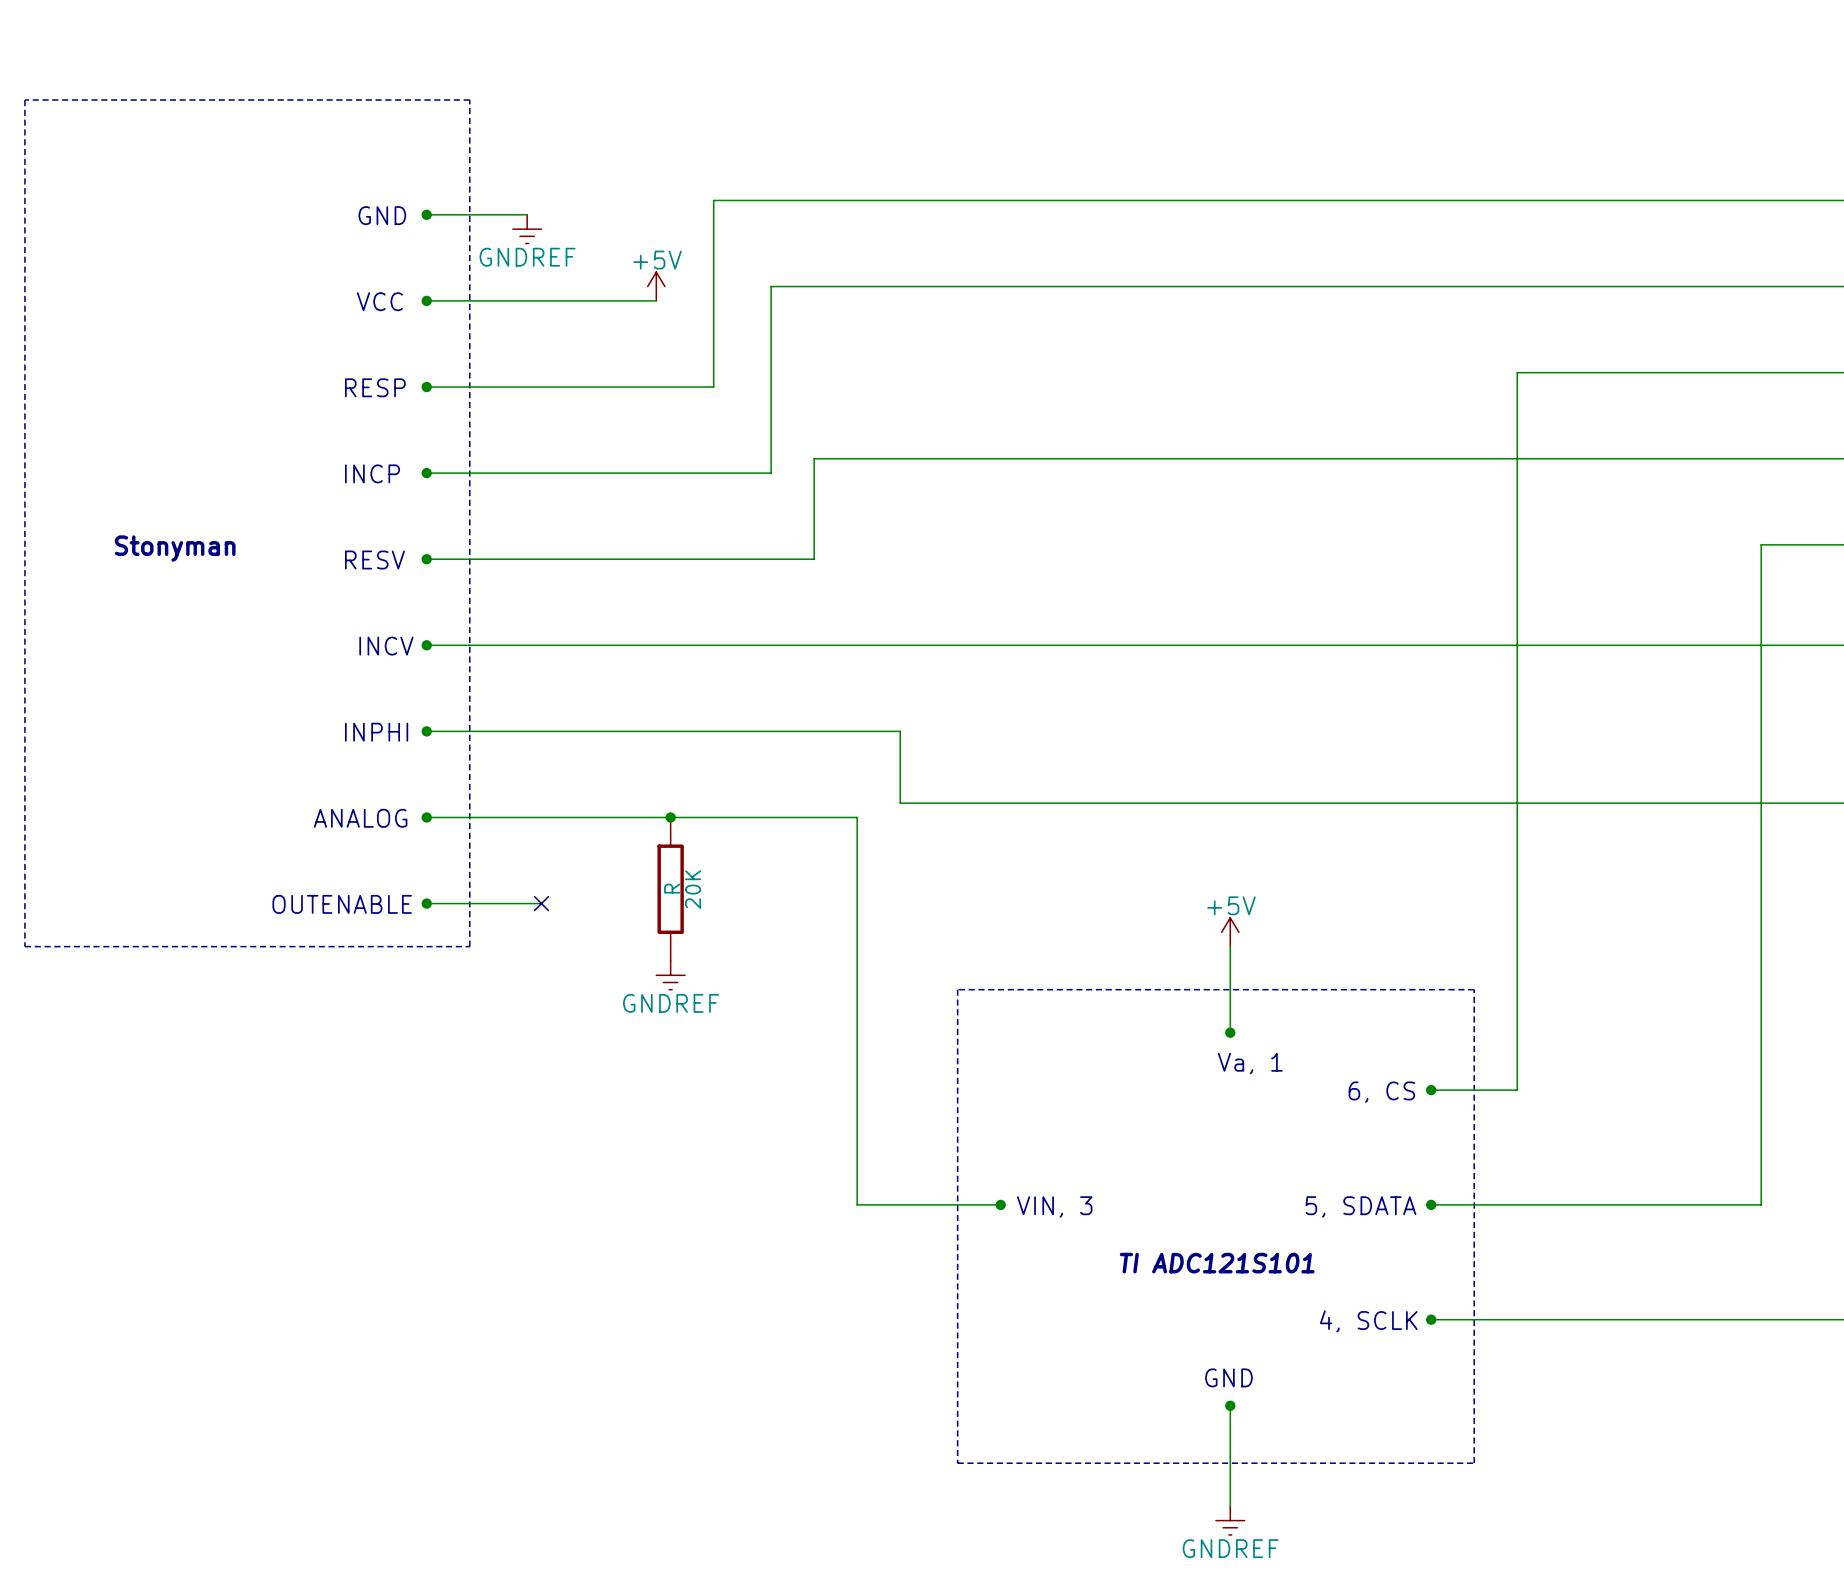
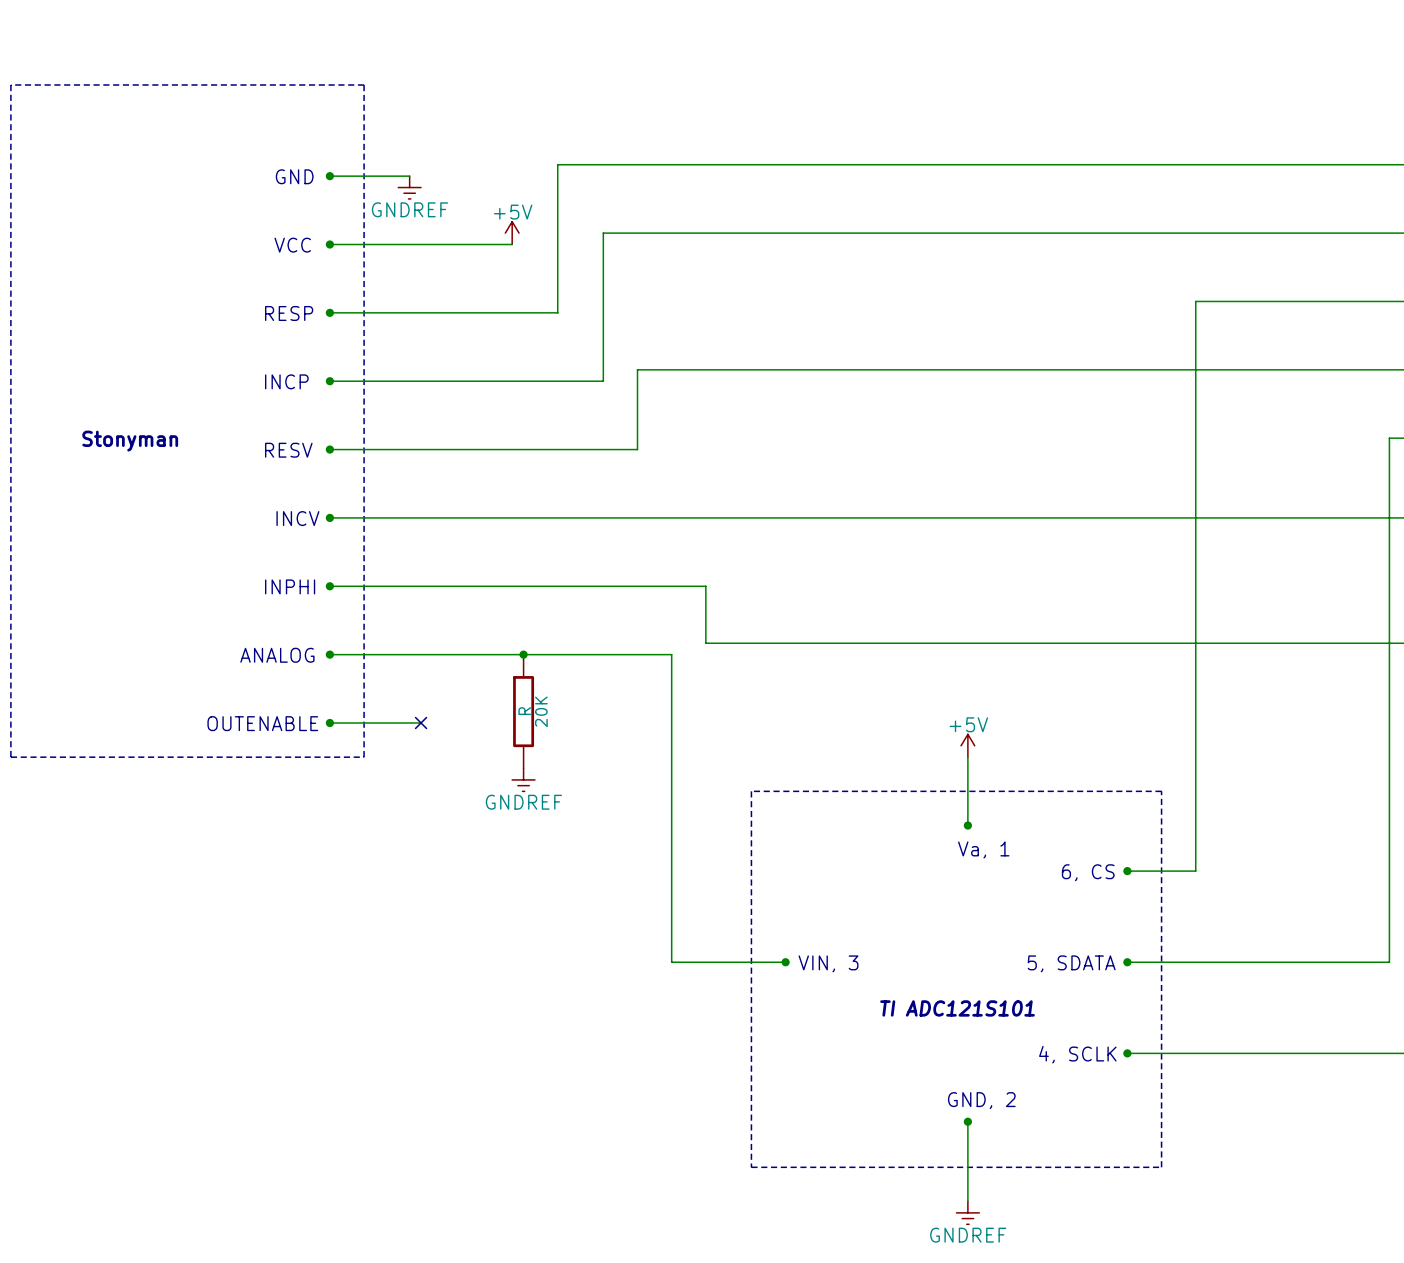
text: GND (1228, 1377) -> GND, 2 (981, 1100)

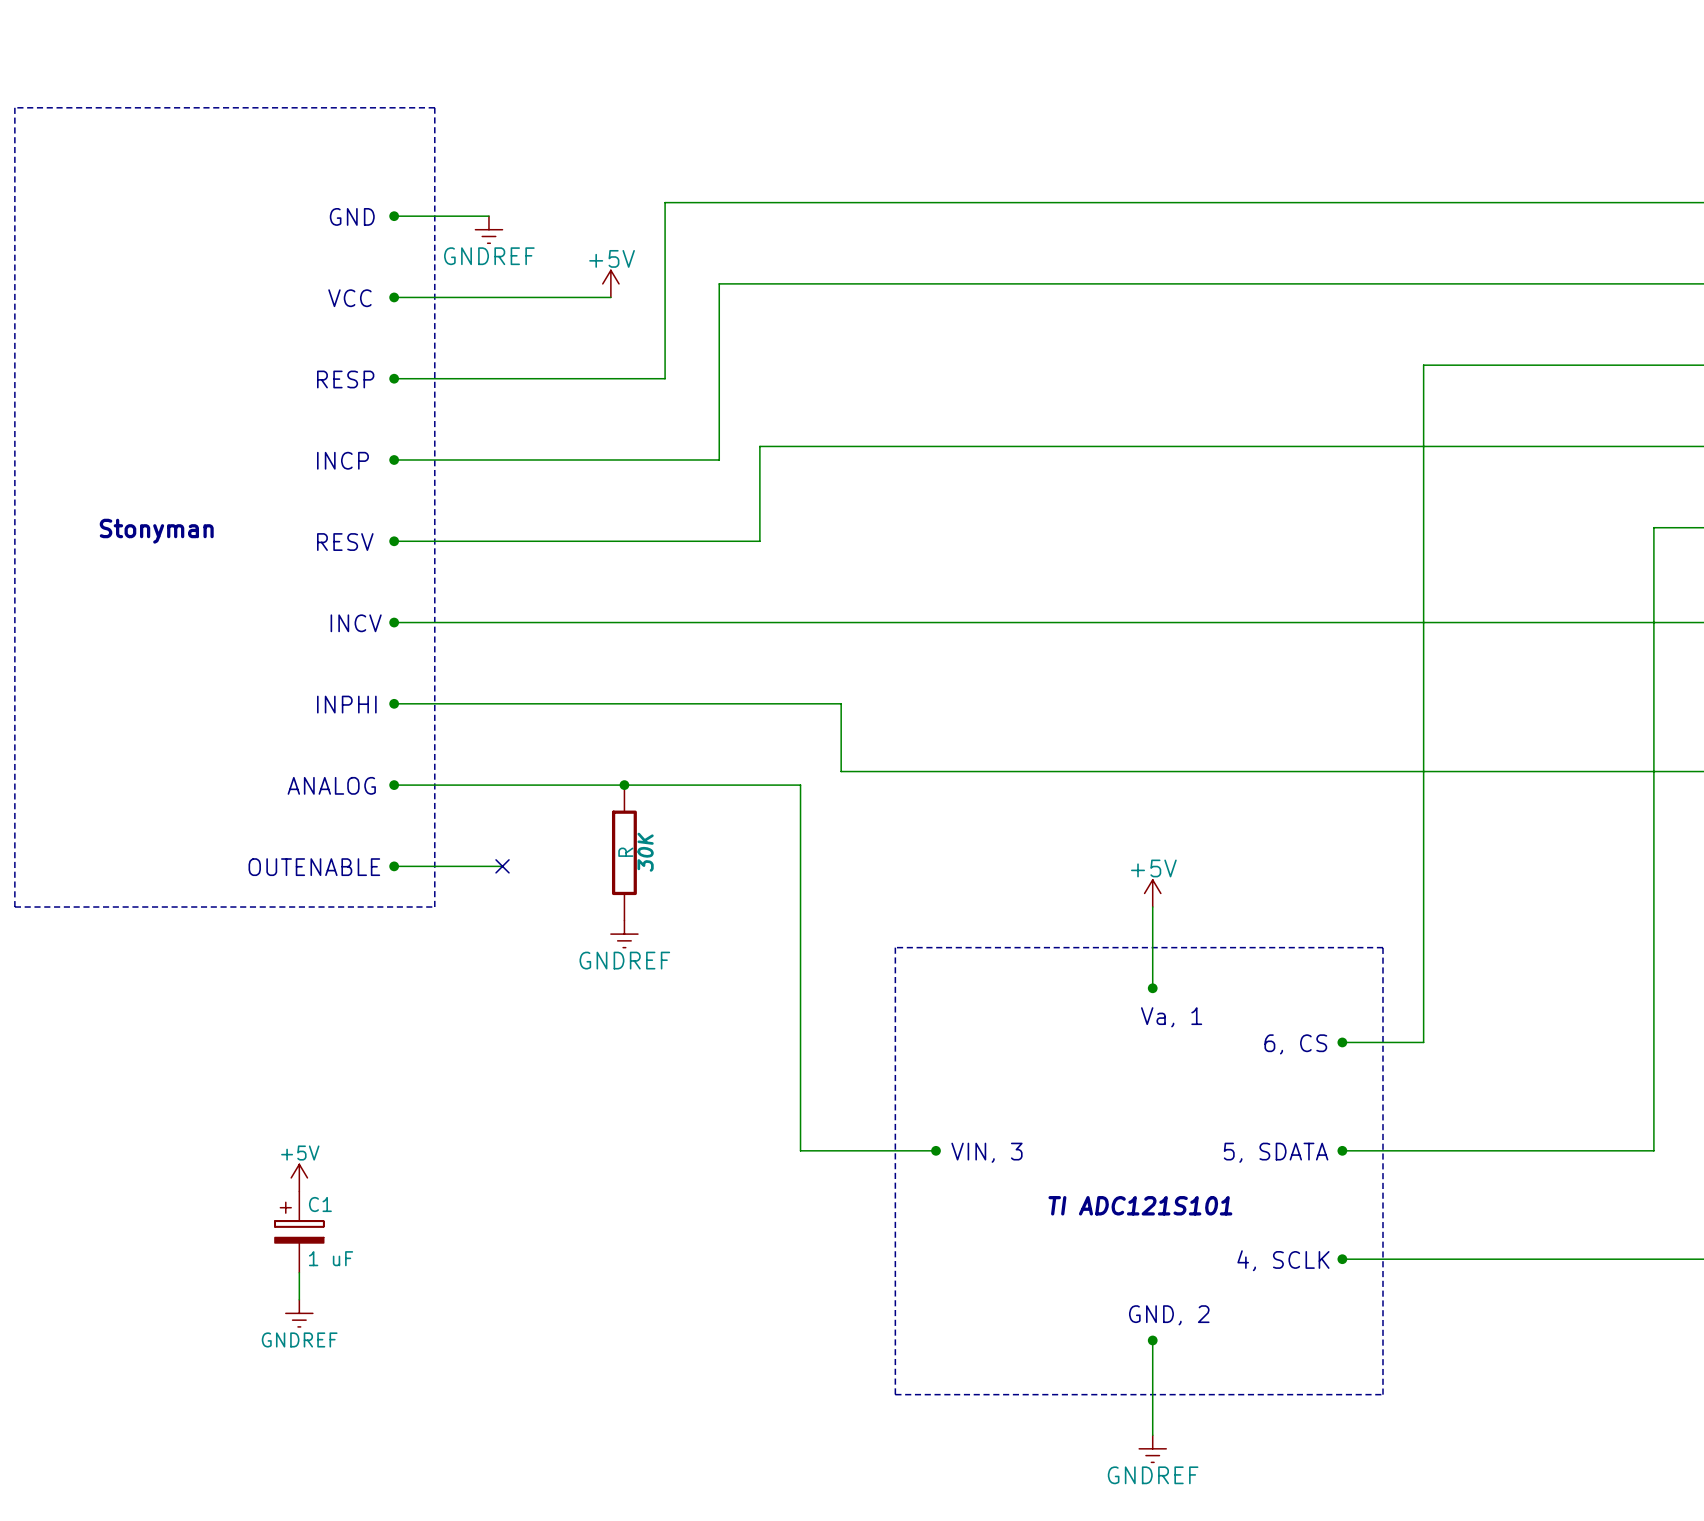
20K name: 20K (541, 711) -> 30K (645, 852)
power symbol: none -> +5V (299, 1177)
C1: none -> 1 uF (299, 1232)
wire: none -> (299, 1272) (299, 1299)
power symbol: none -> GNDREF (299, 1313)

